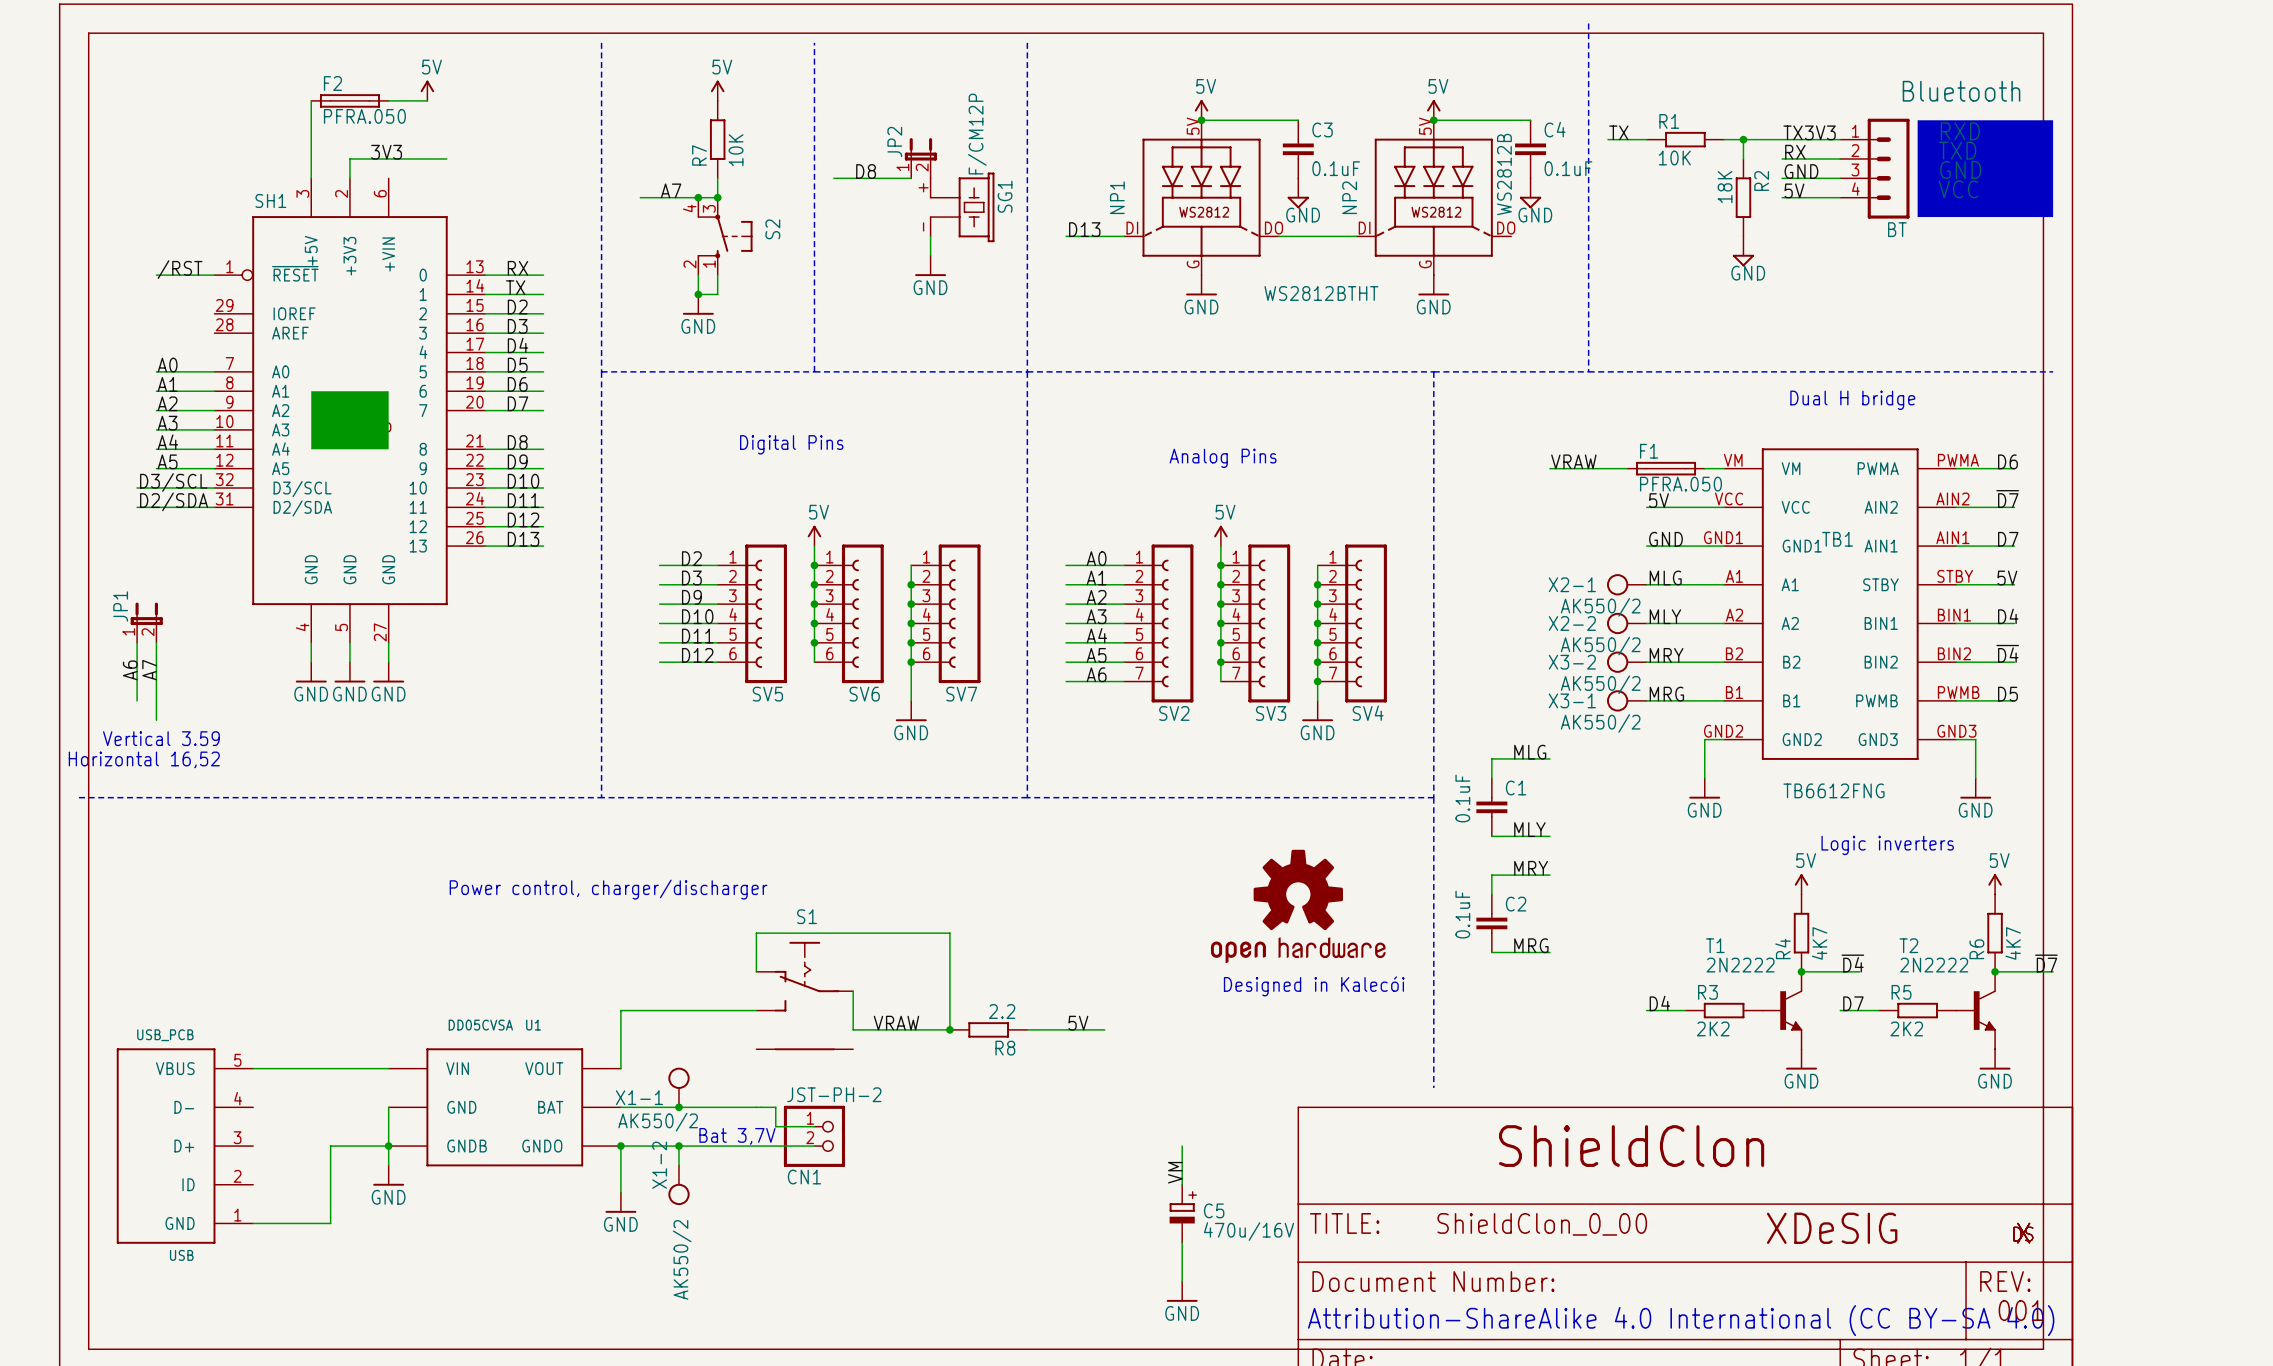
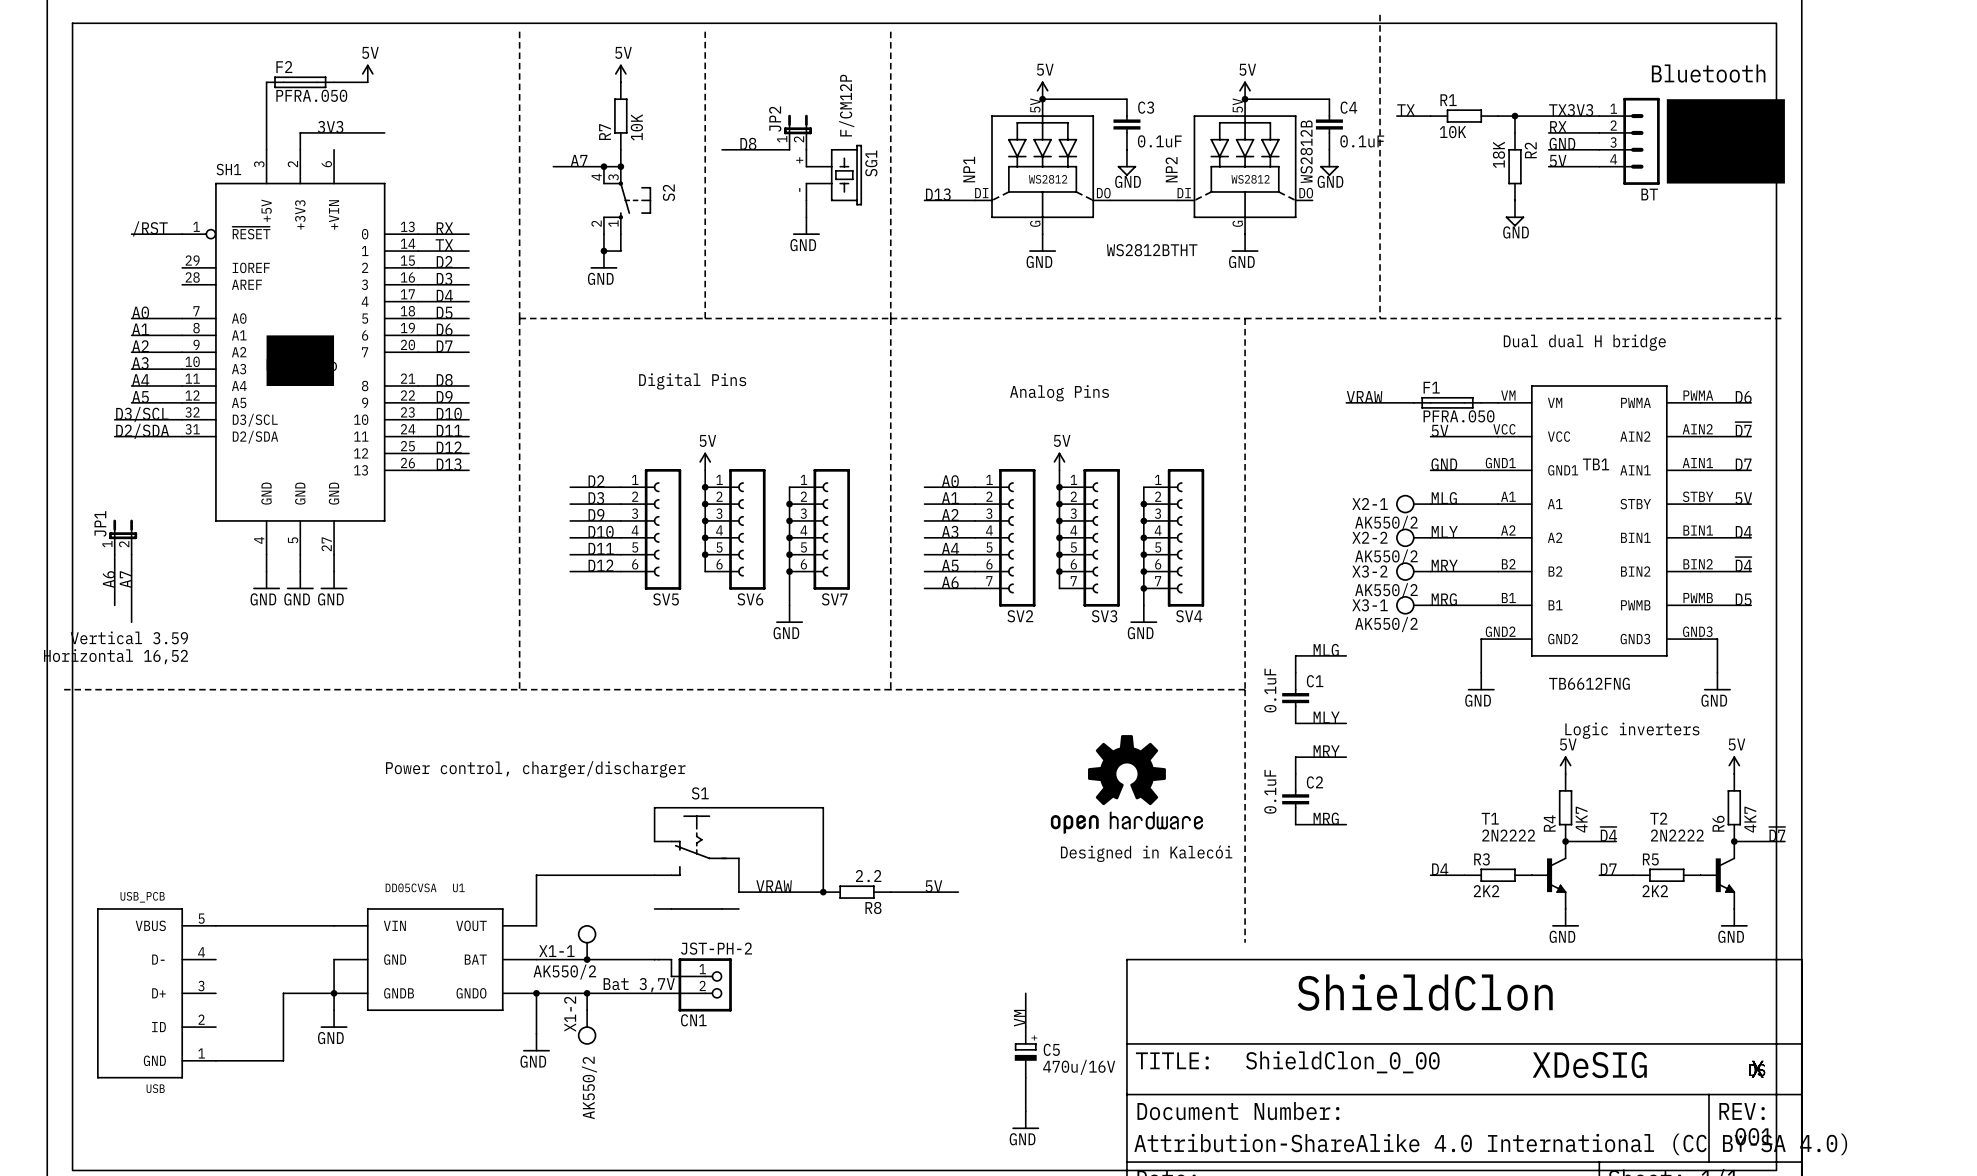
text: Dual H bridge (1852, 400) -> Dual dual H bridge (1584, 342)

